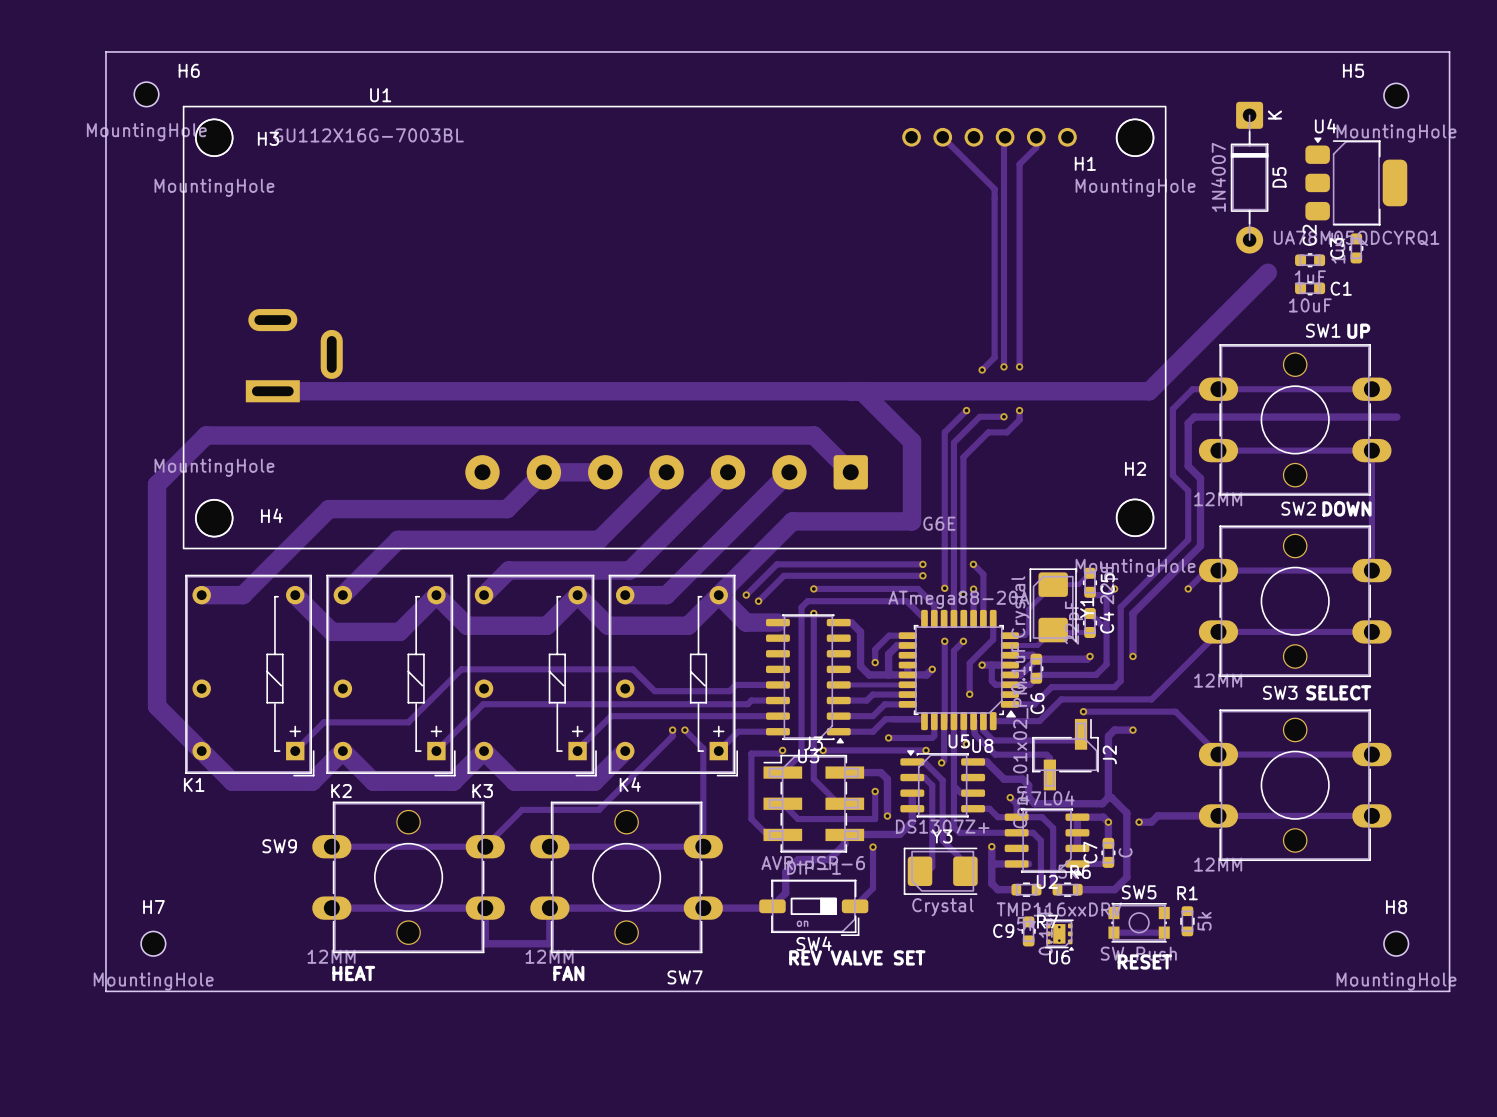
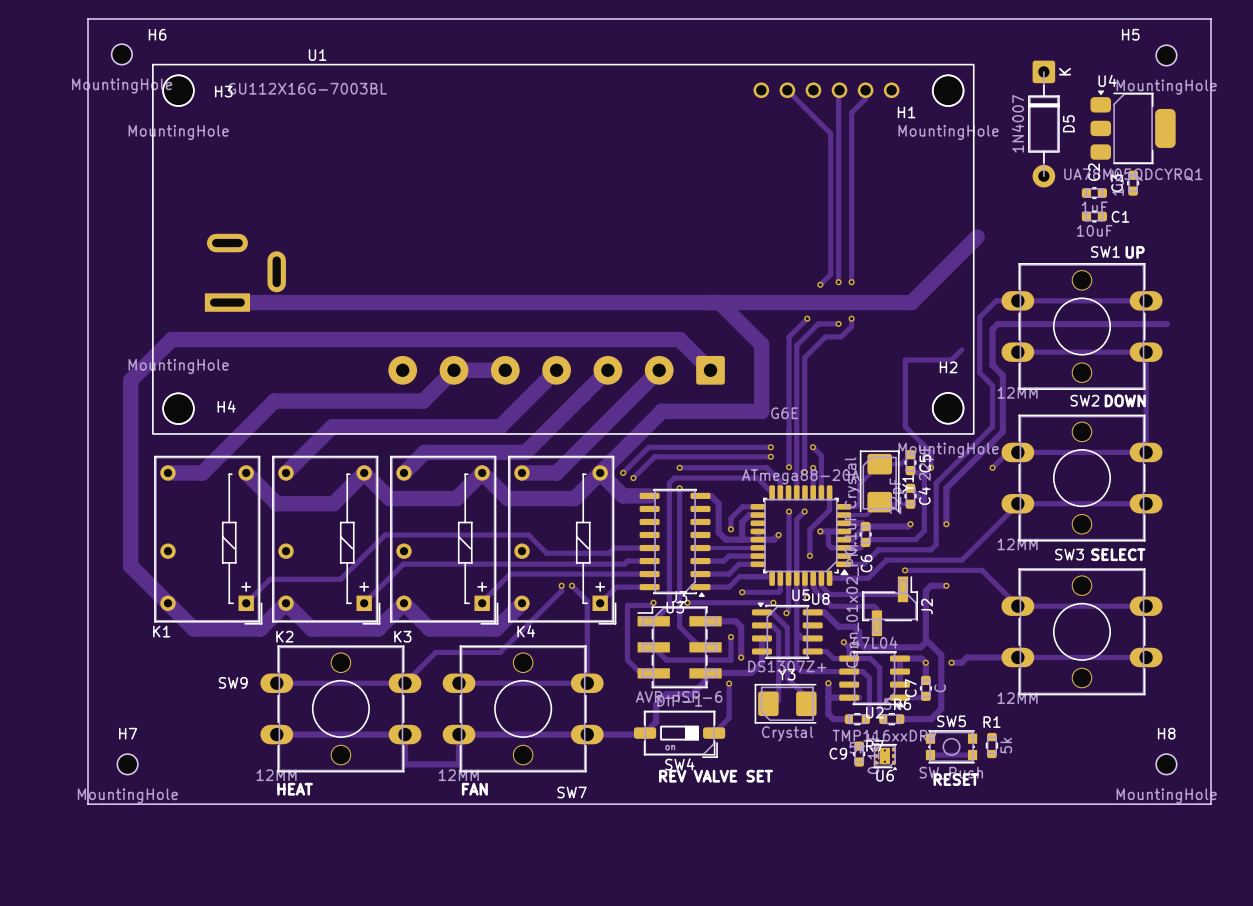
track: (1267, 272) (1149, 391) (1091, 391) -> (977, 236) (911, 302)
track: none -> (961, 349) (951, 360) (905, 360) (905, 426) (931, 452) (931, 467)

